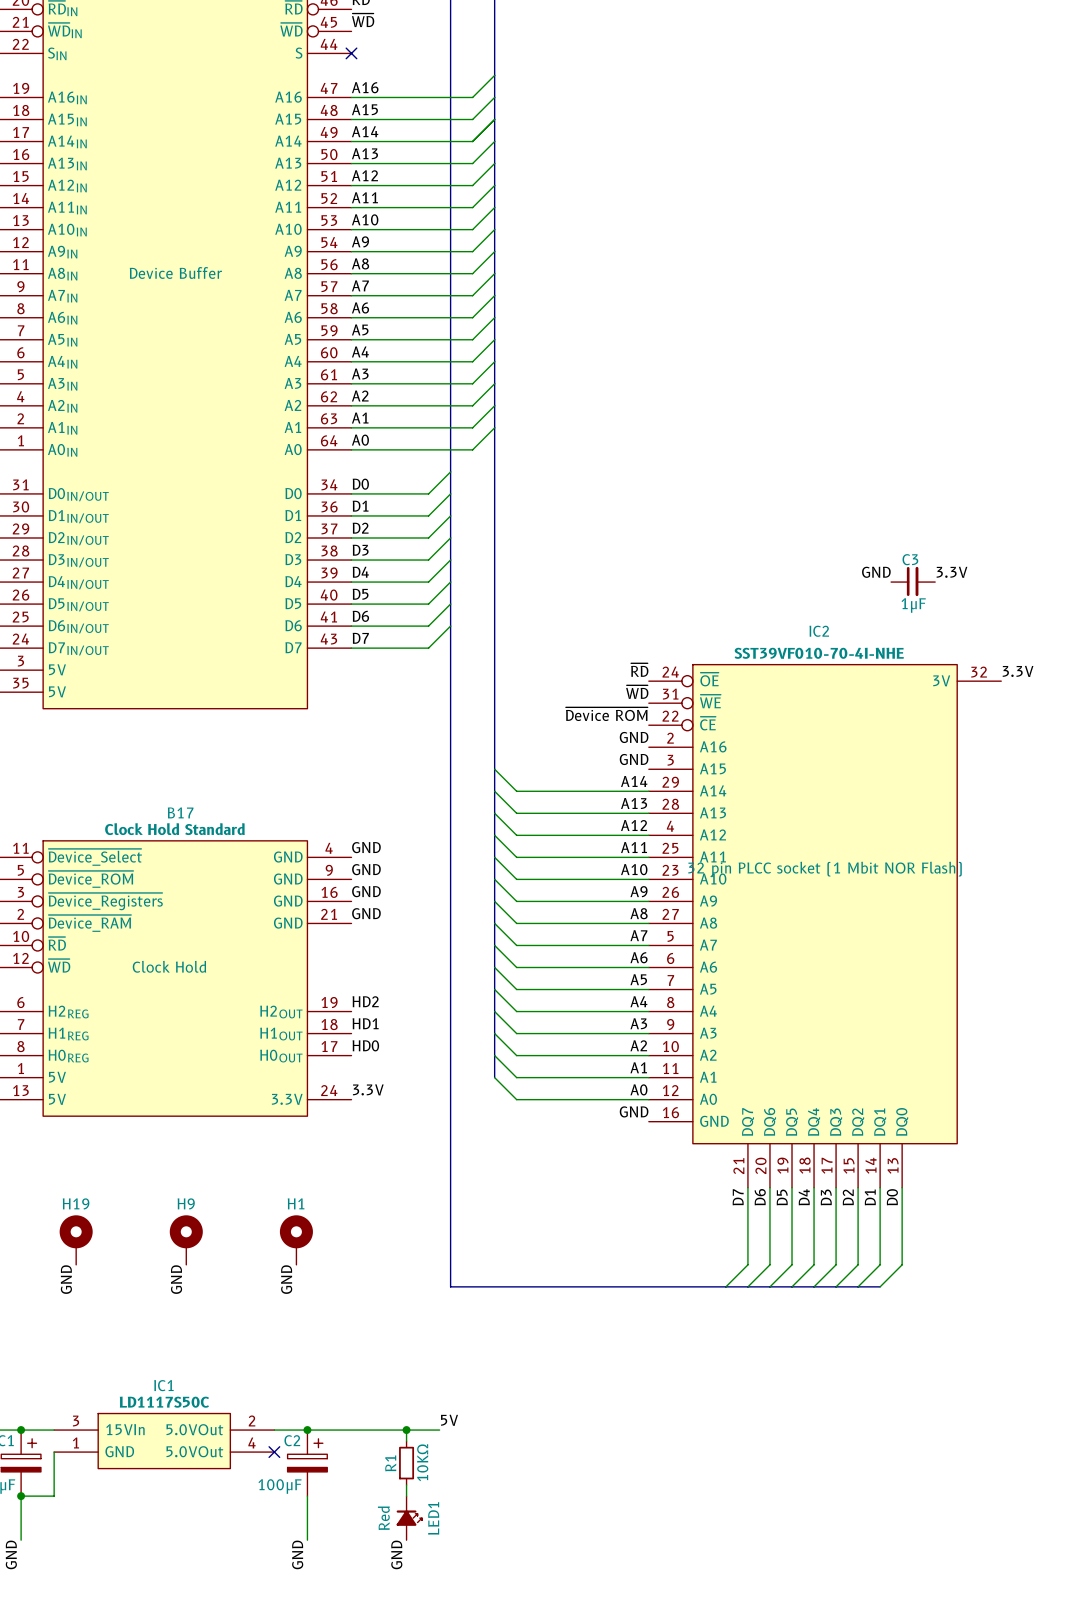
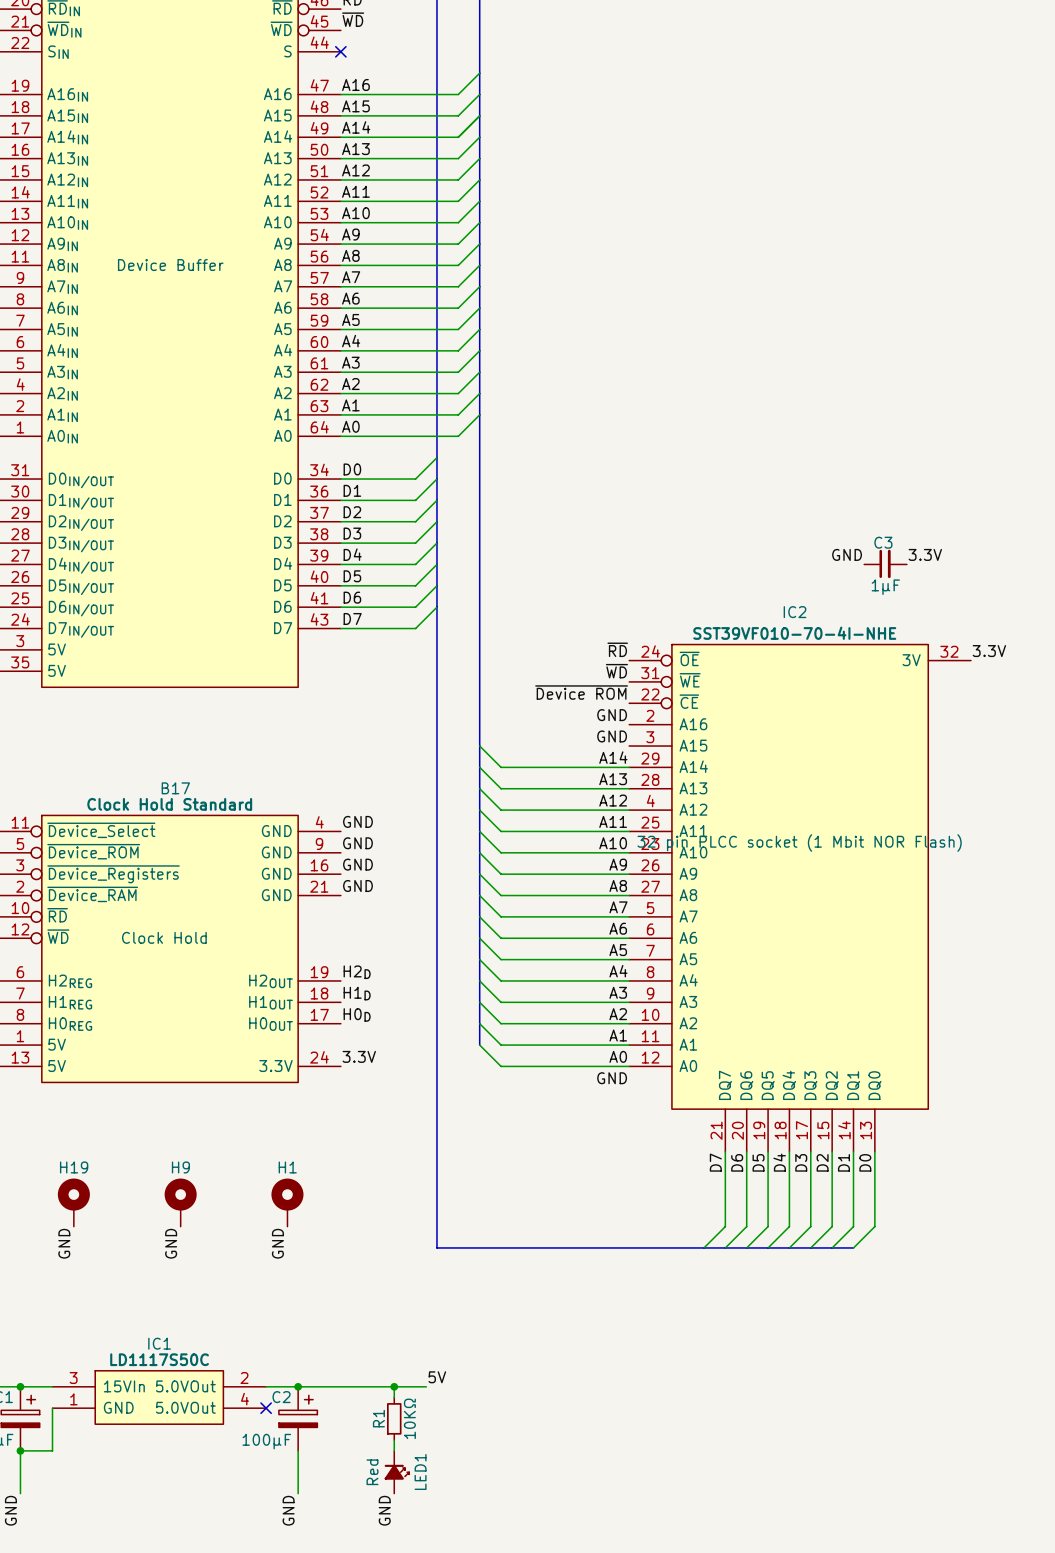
IC2 symbol: [648, 663, 1002, 1188] -> [629, 643, 971, 1152]
label: HD2 (365, 1001) -> H2D (357, 972)
label: HD1 (365, 1023) -> H1D (357, 993)
label: HD0 (365, 1045) -> H0D (357, 1014)

